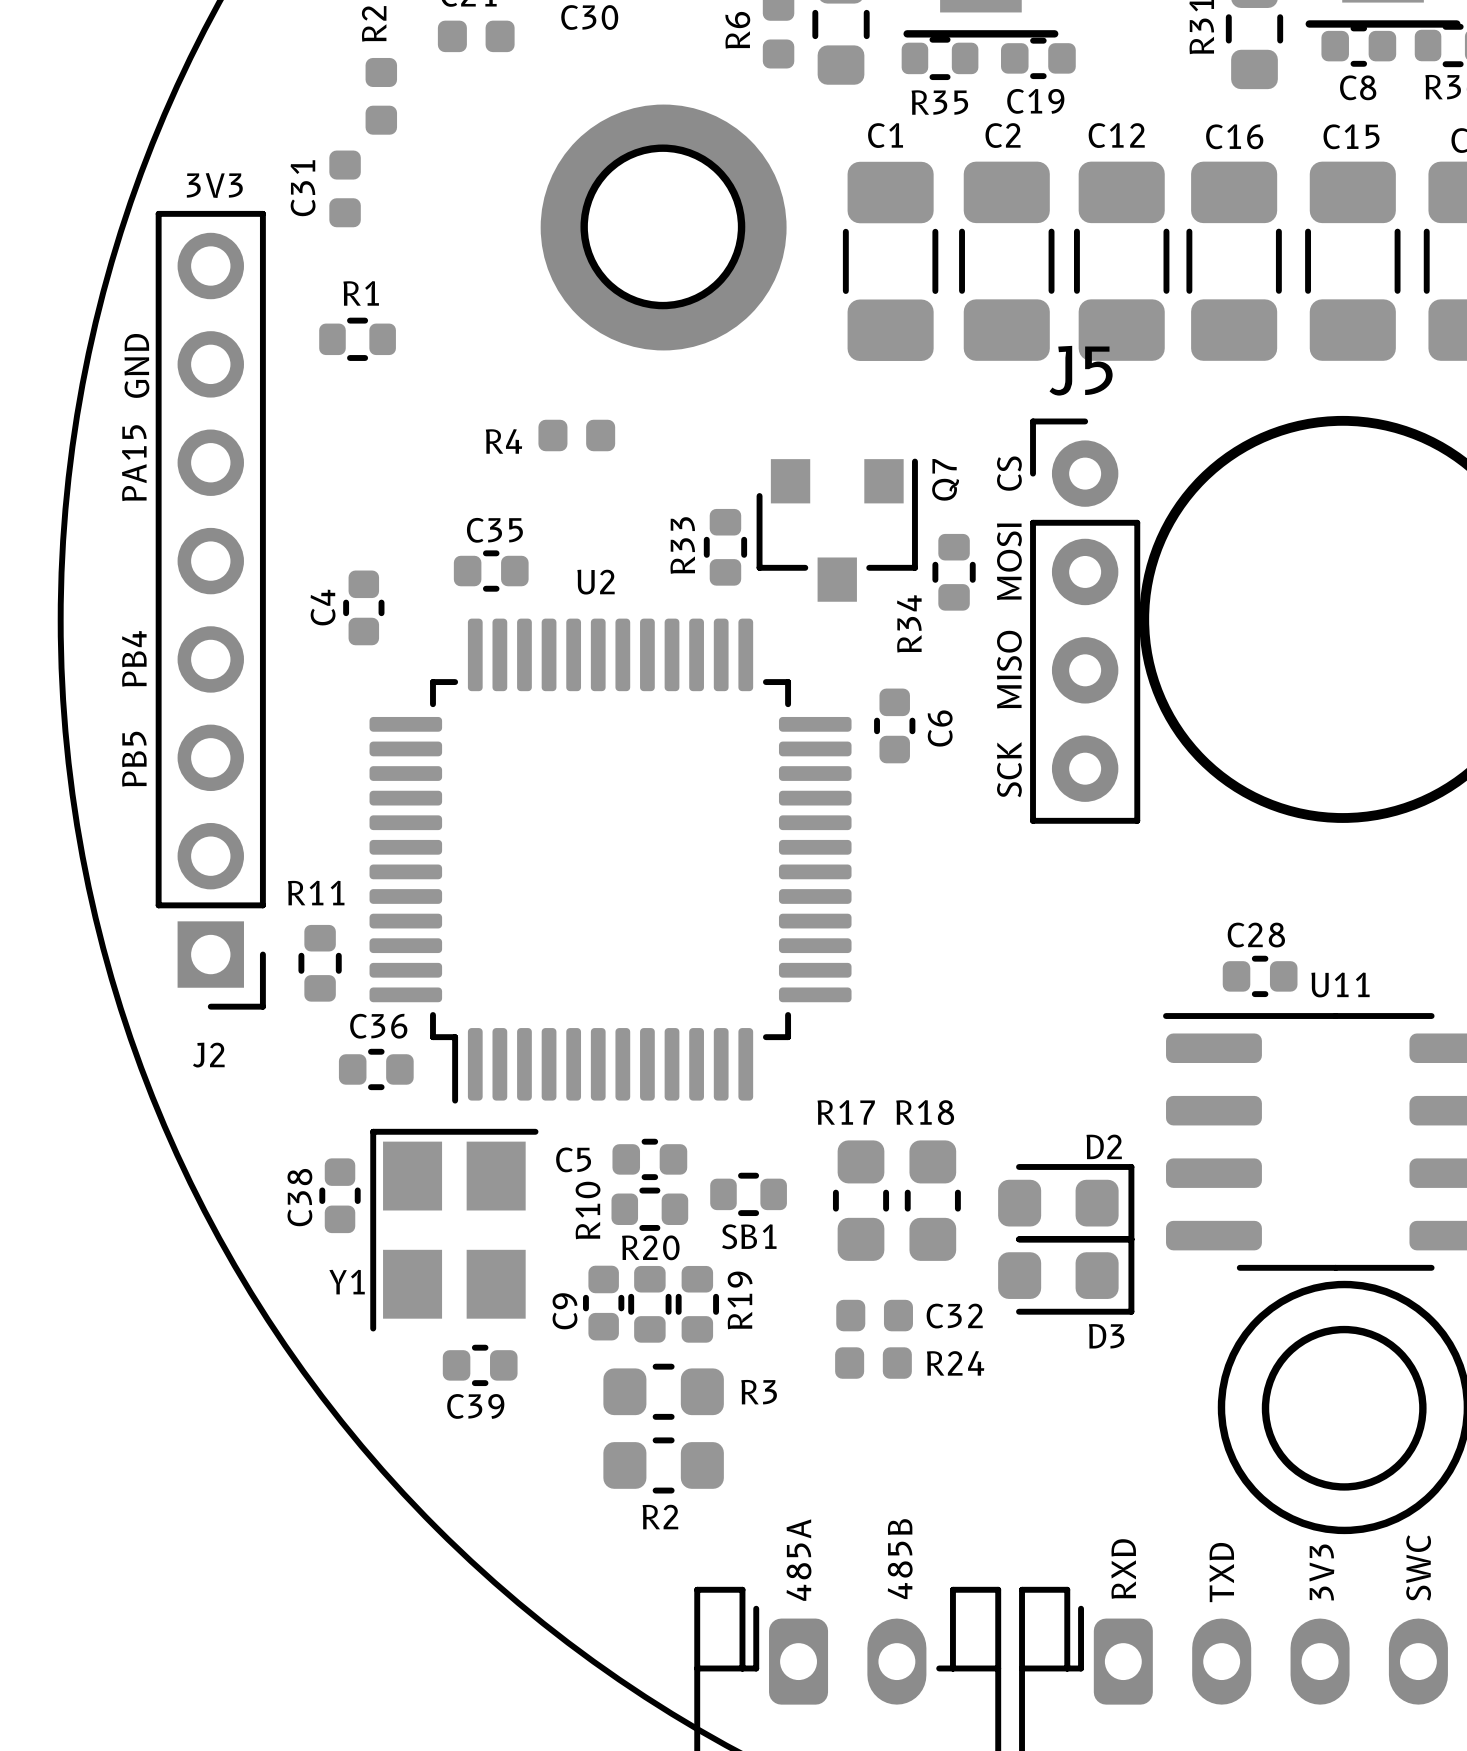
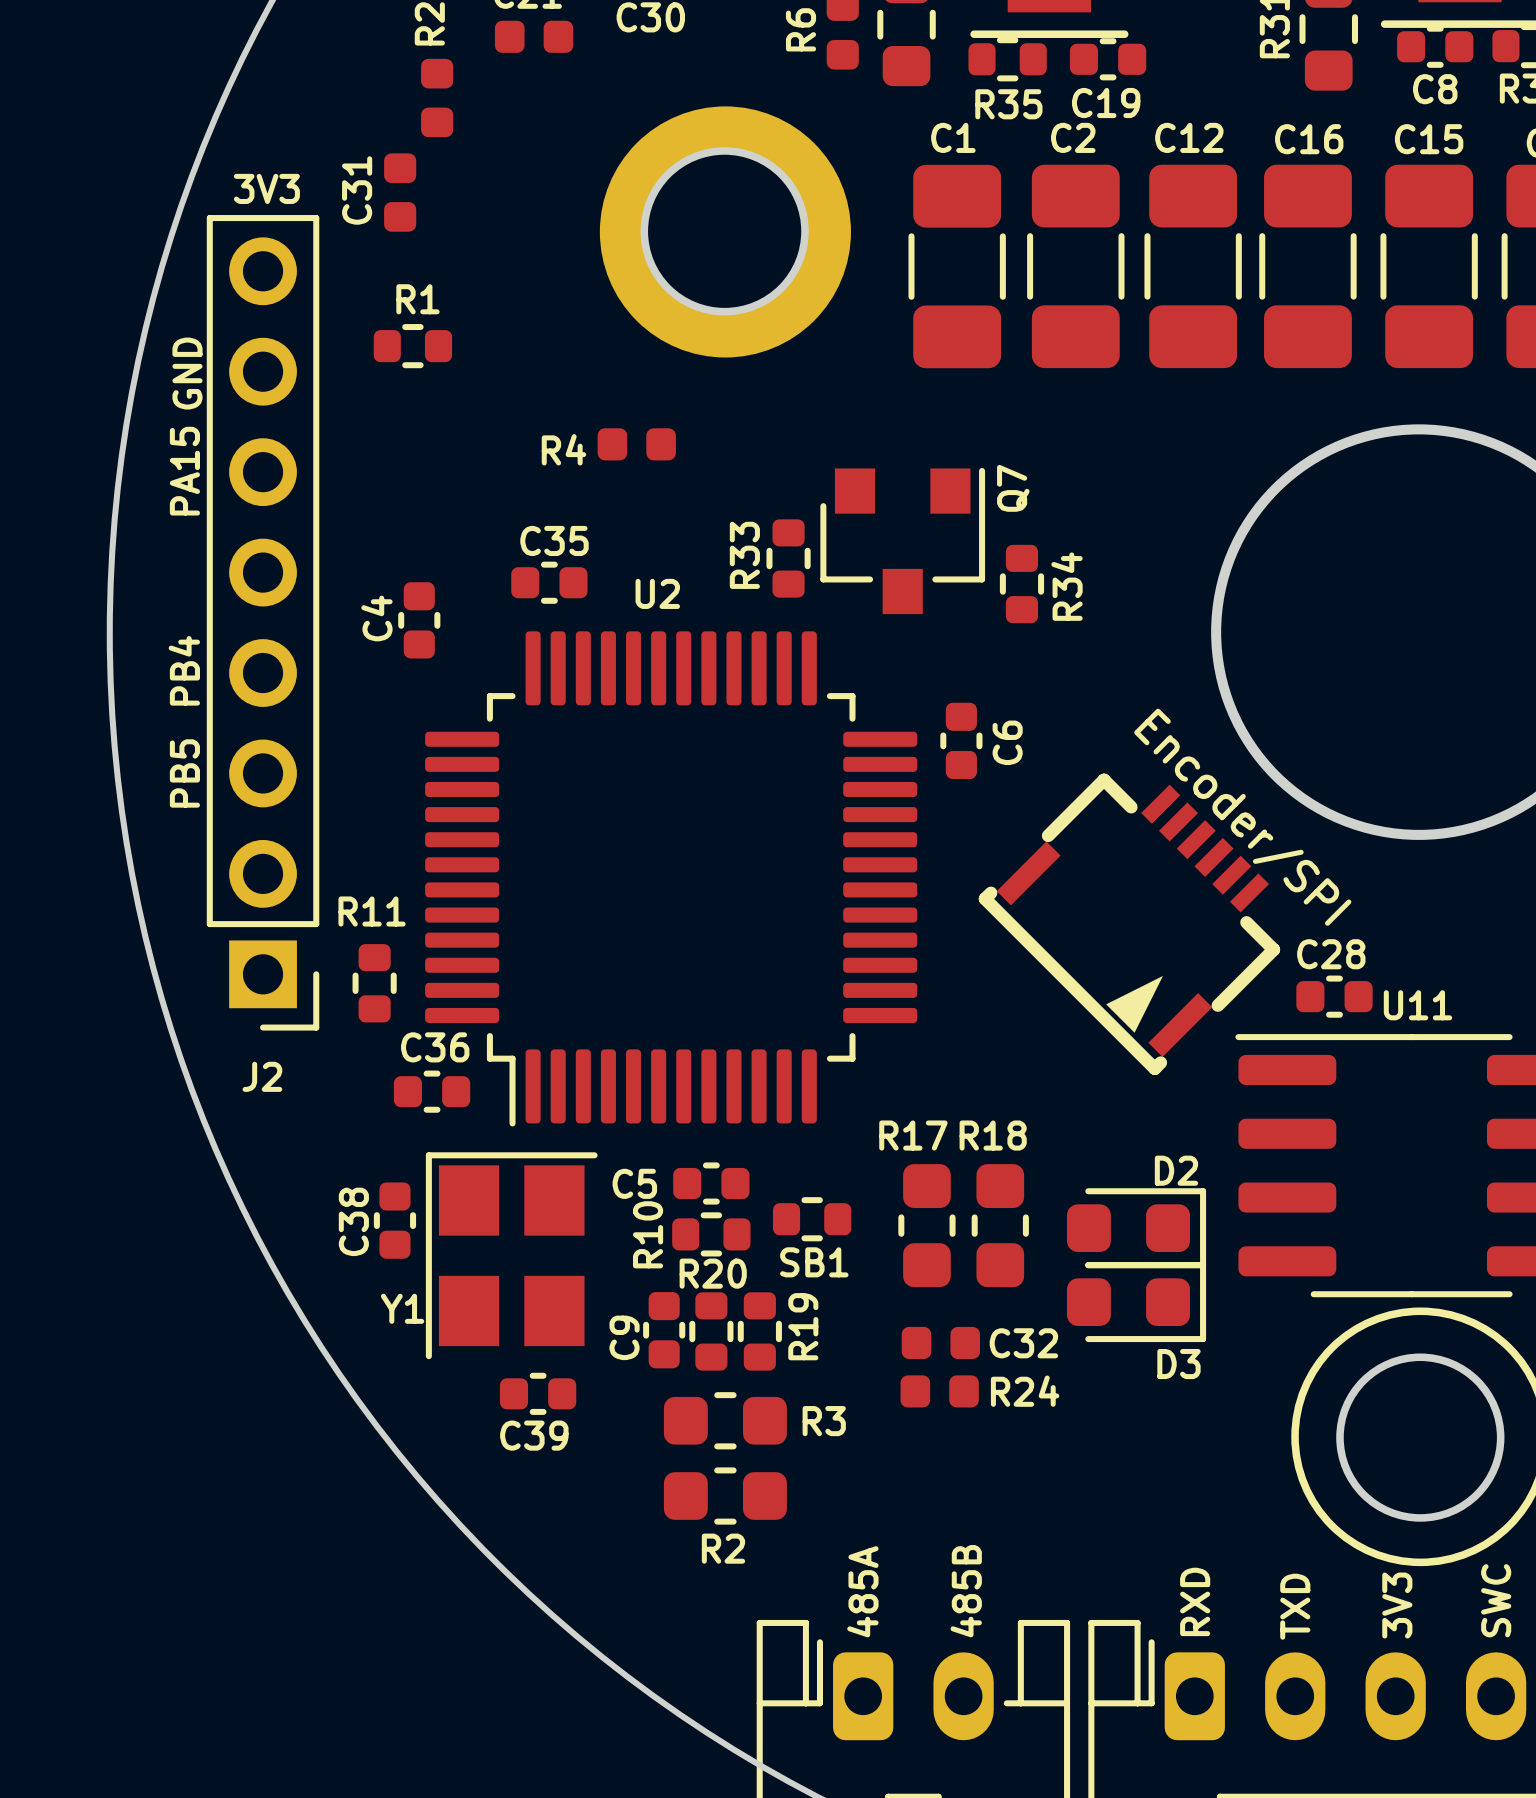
text: CS (1009, 473) -> none
text: MOSI (1009, 561) -> none
J5: (1085, 621) -> none
R34 name position: R34 (909, 623) -> R34 (1066, 586)
text: MISO (1009, 669) -> none
text: SCK (1009, 769) -> none
part: none -> Encoder/SPI (1129, 924)

